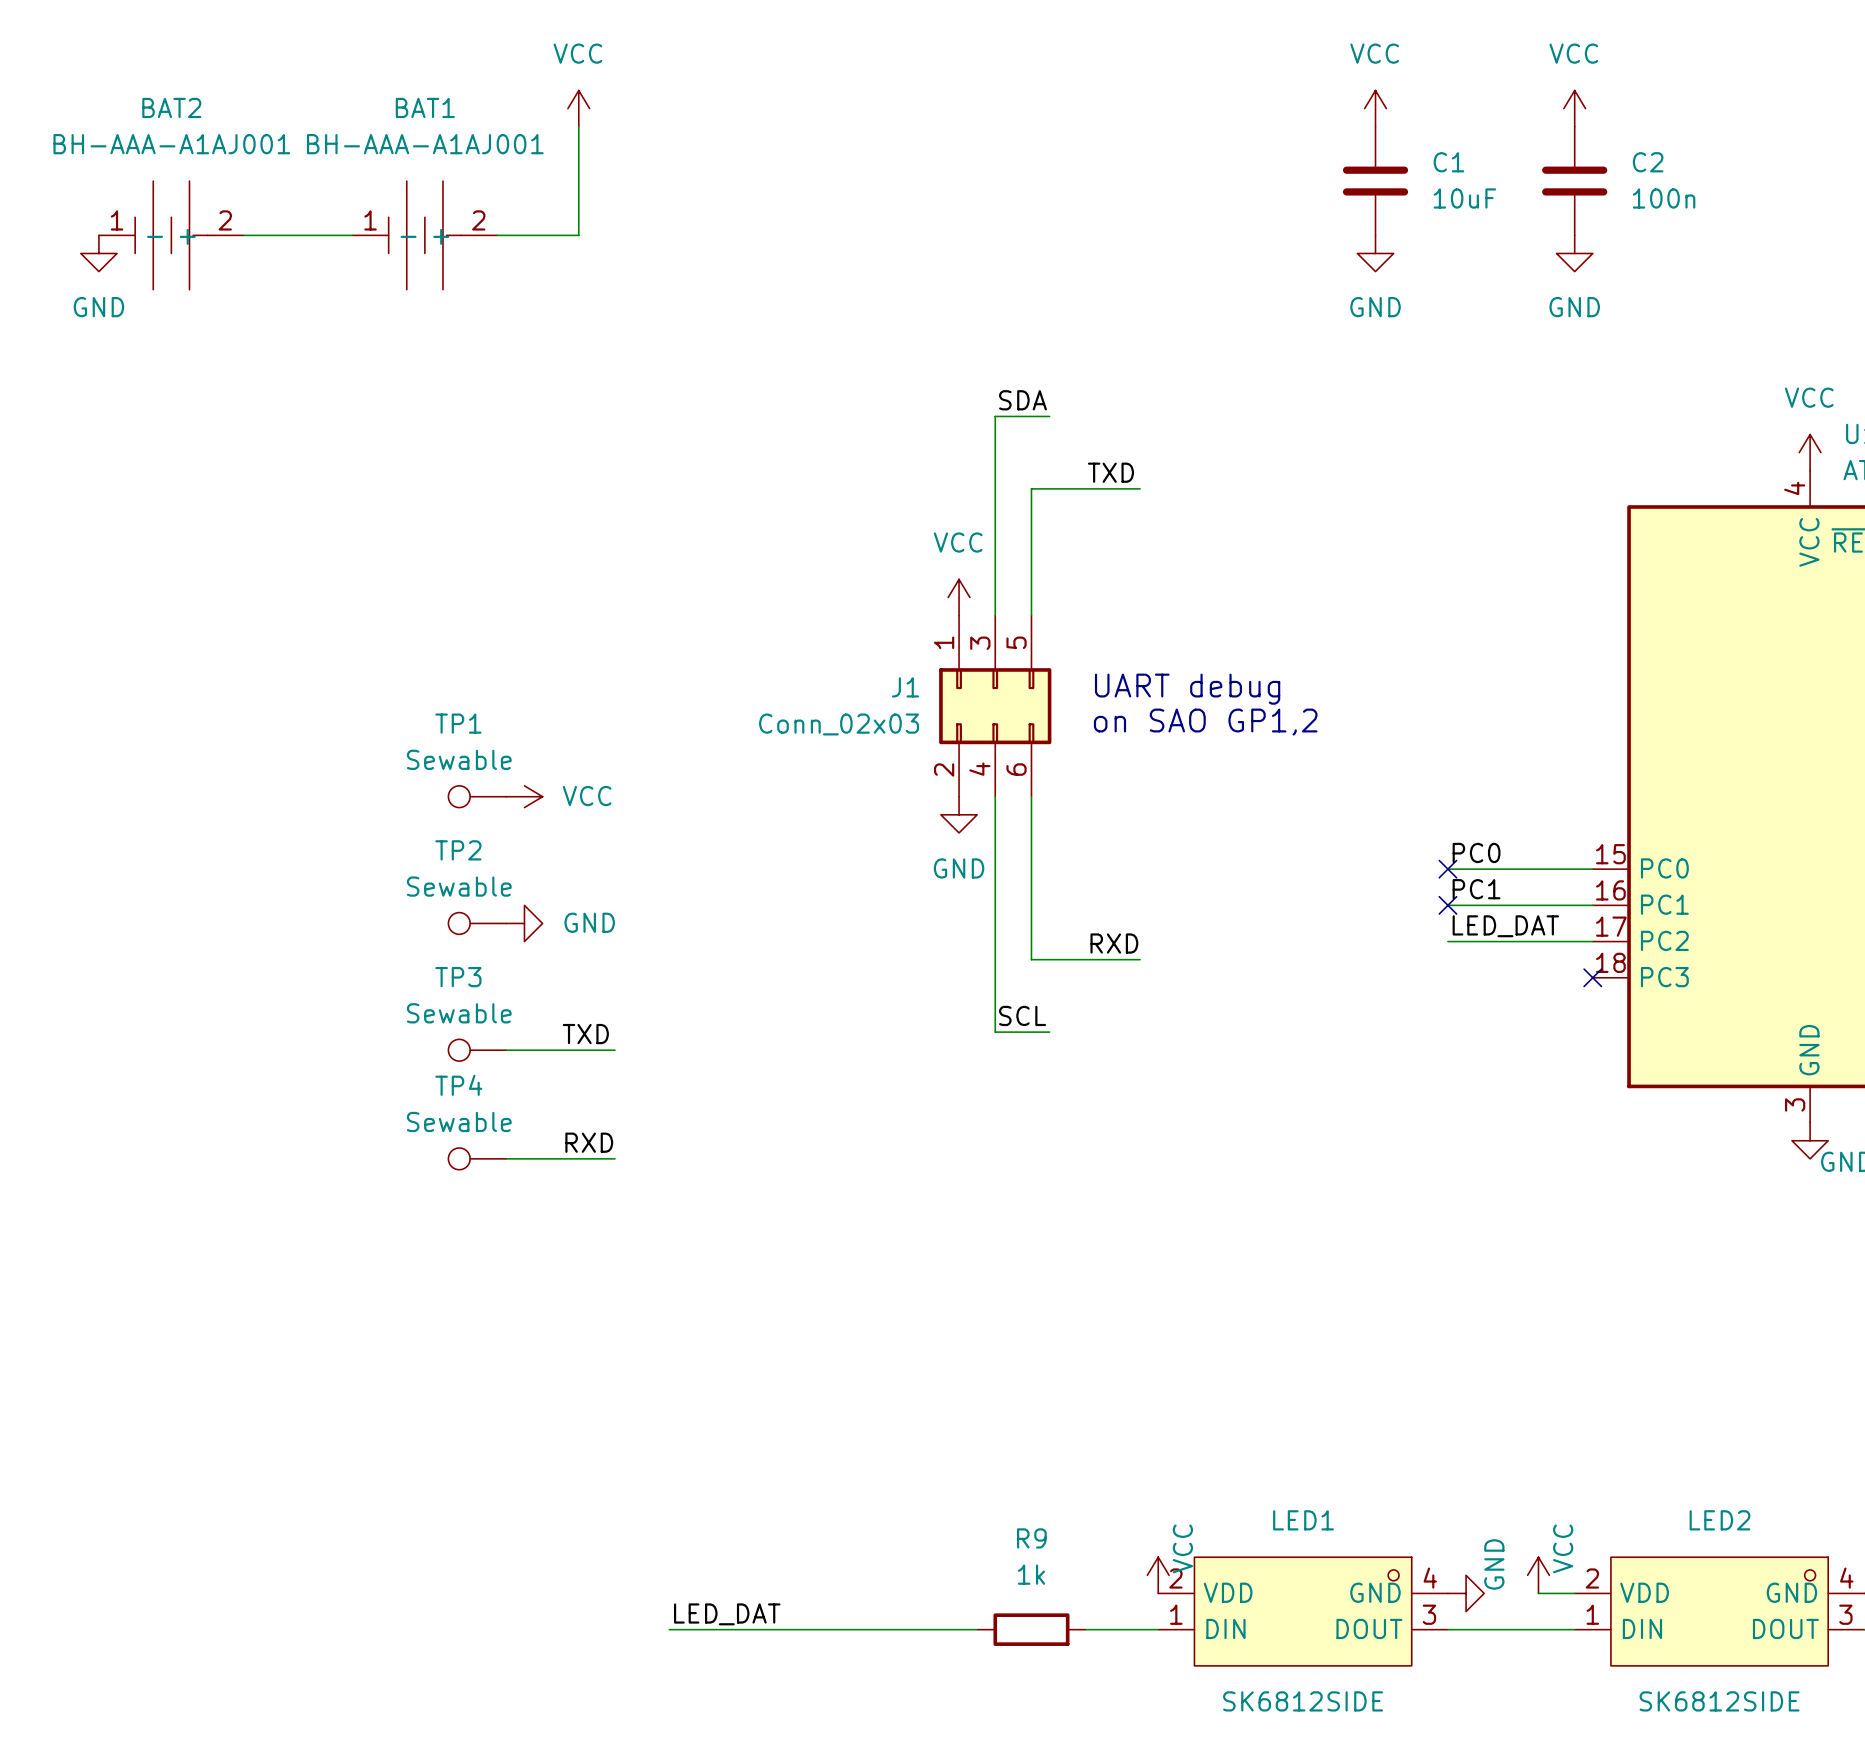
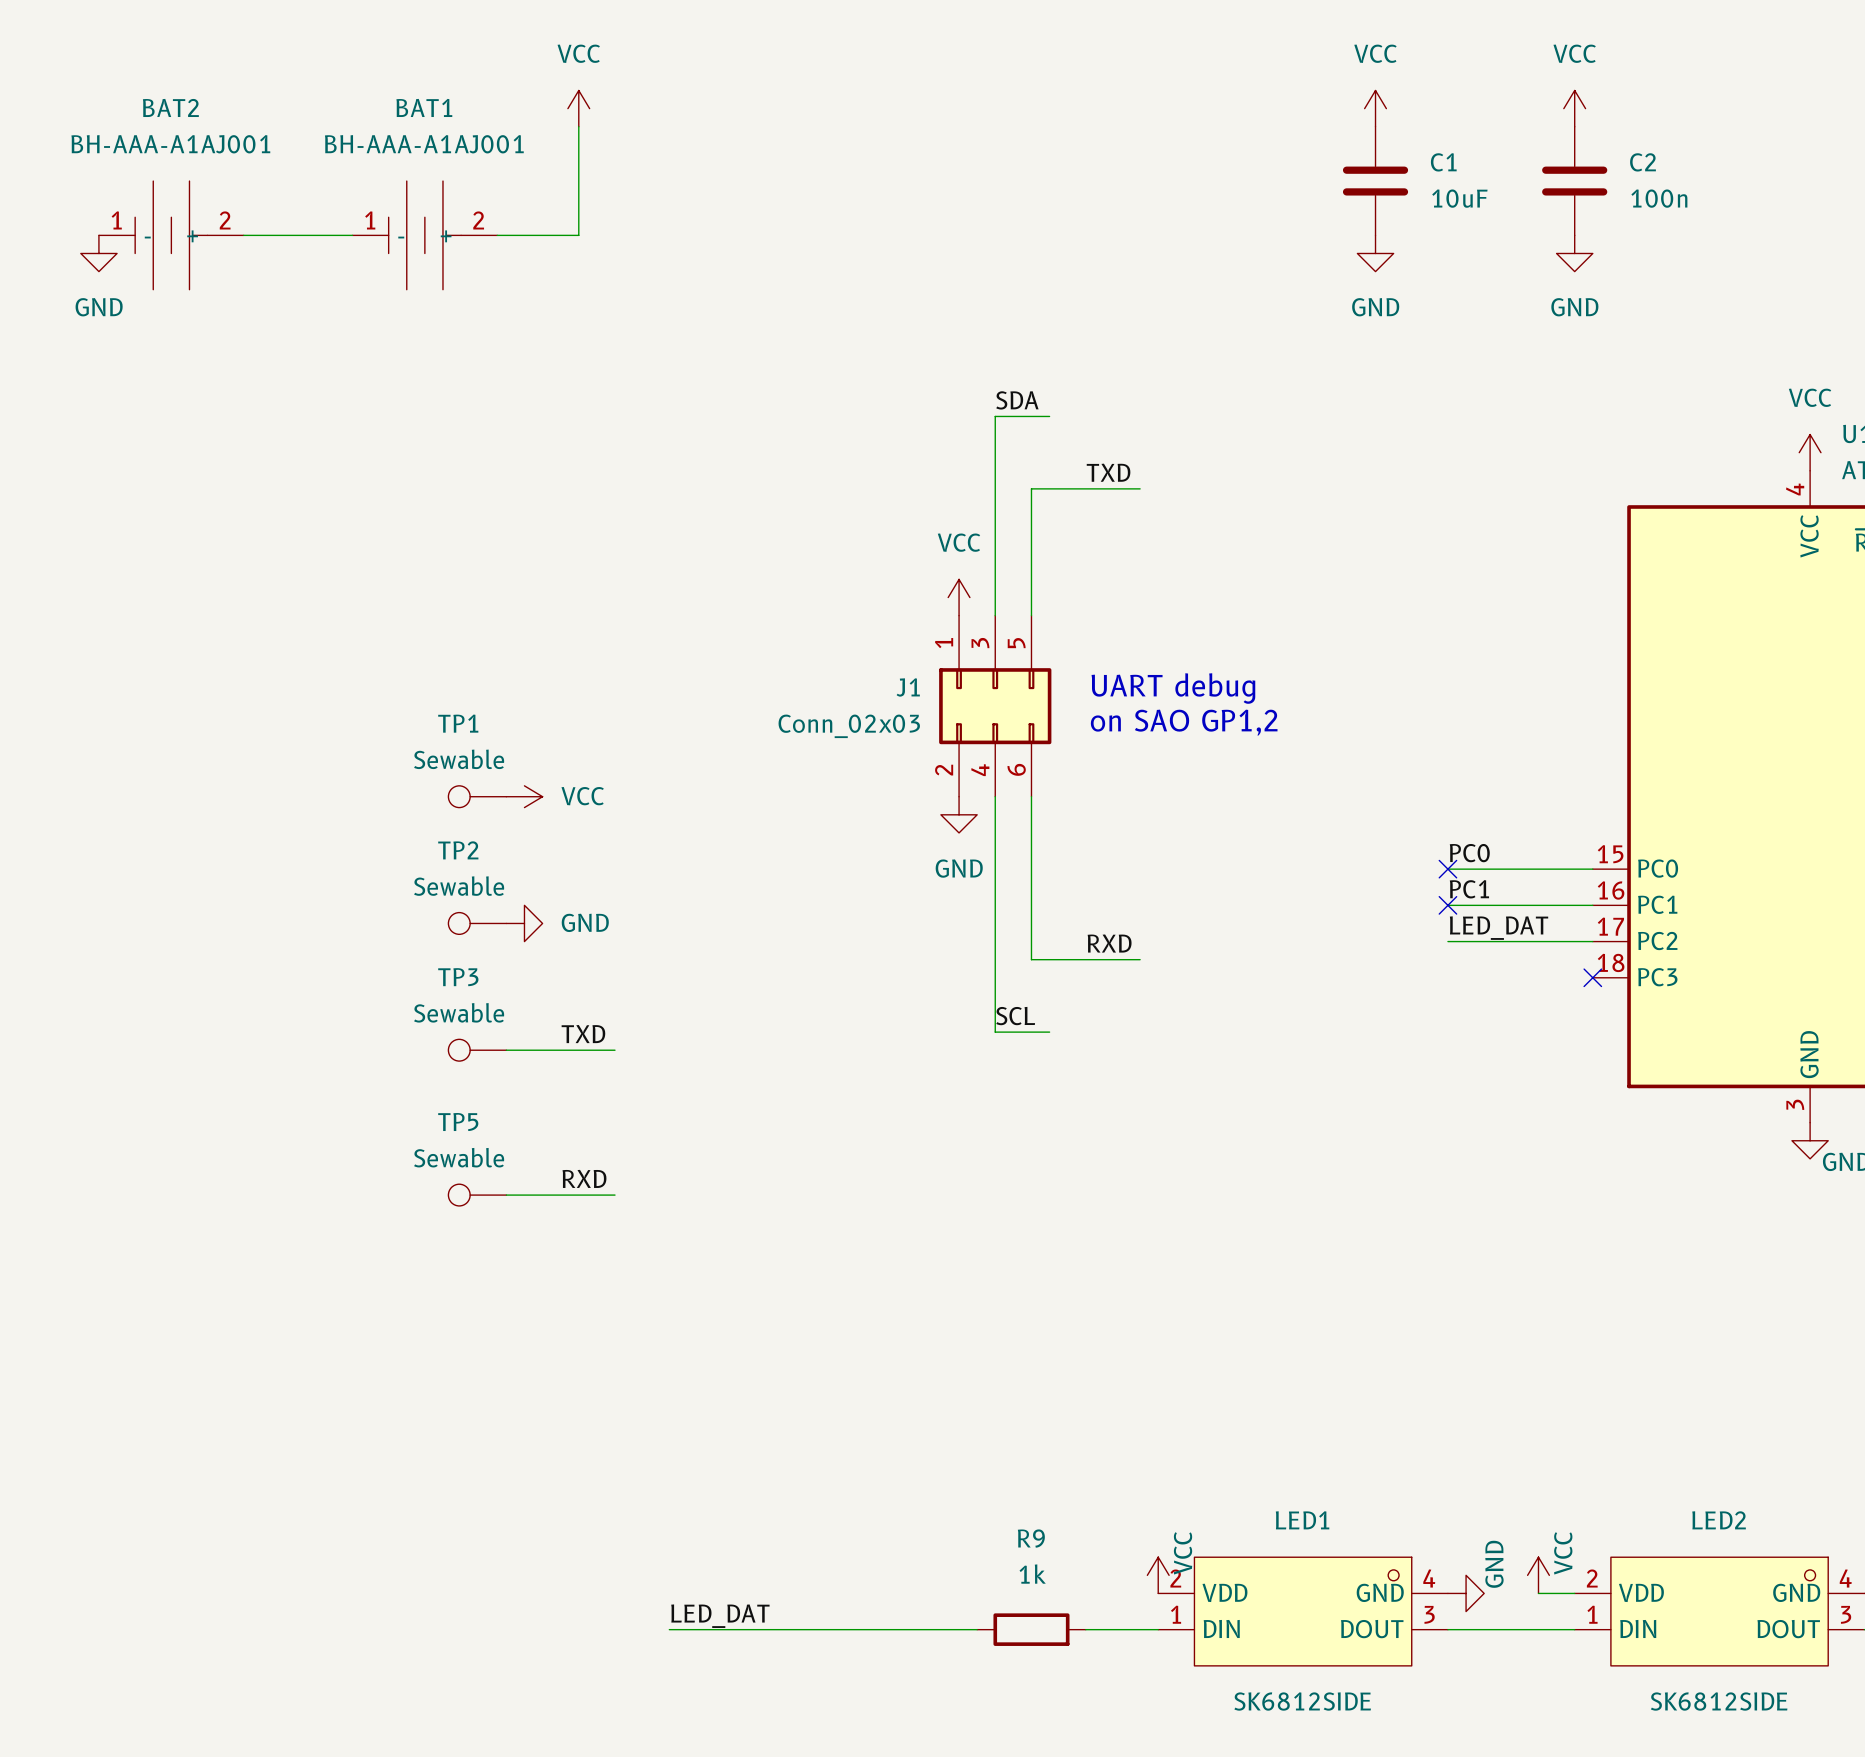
label position: RXD (589, 1142) -> RXD (584, 1178)
TP4: Sewable (477, 1158) -> none
wire: (506, 1158) (615, 1158) -> (506, 1195) (615, 1195)
TP5: none -> Sewable (477, 1195)

